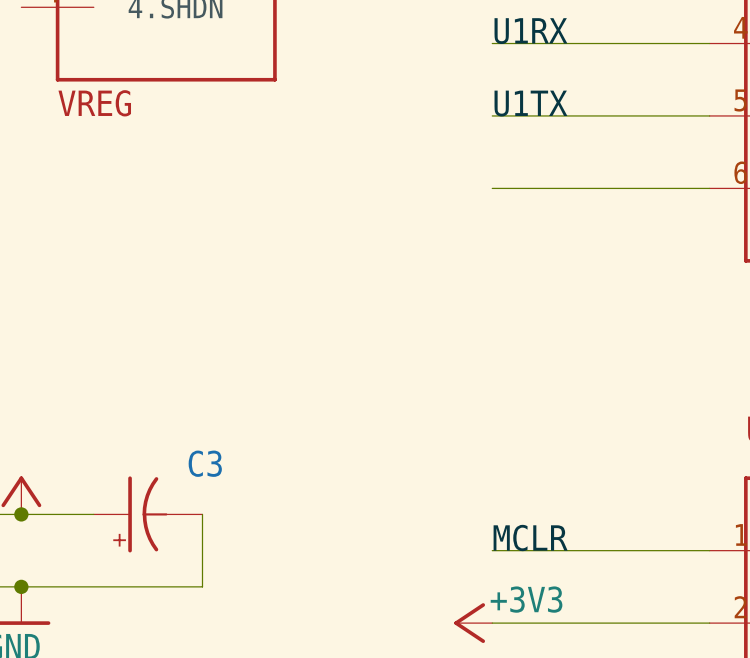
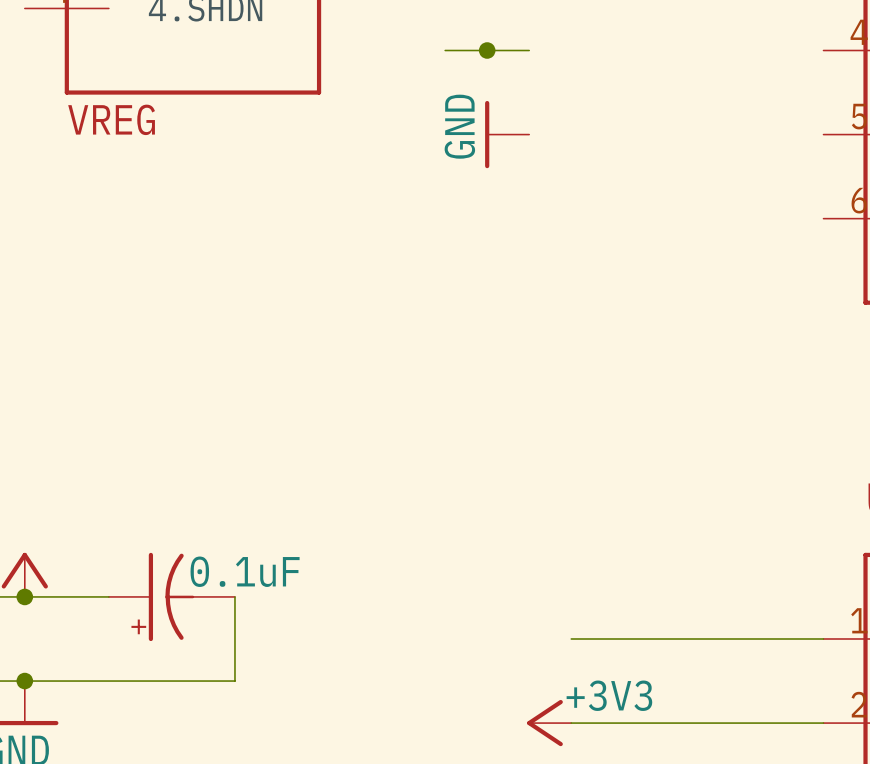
label: U1RX (530, 31) -> none
wire: none -> (445, 50) (529, 50)
junction: none -> (487, 50)
wire: (492, 43) (709, 43) -> none
label: U1TX (530, 103) -> none
power symbol: none -> GND (507, 134)
wire: (492, 115) (709, 115) -> none
wire: (492, 188) (709, 188) -> none
C3 name: C3 (205, 463) -> none
C3 value: none -> 0.1uF (245, 571)
label: MCLR (530, 537) -> none

